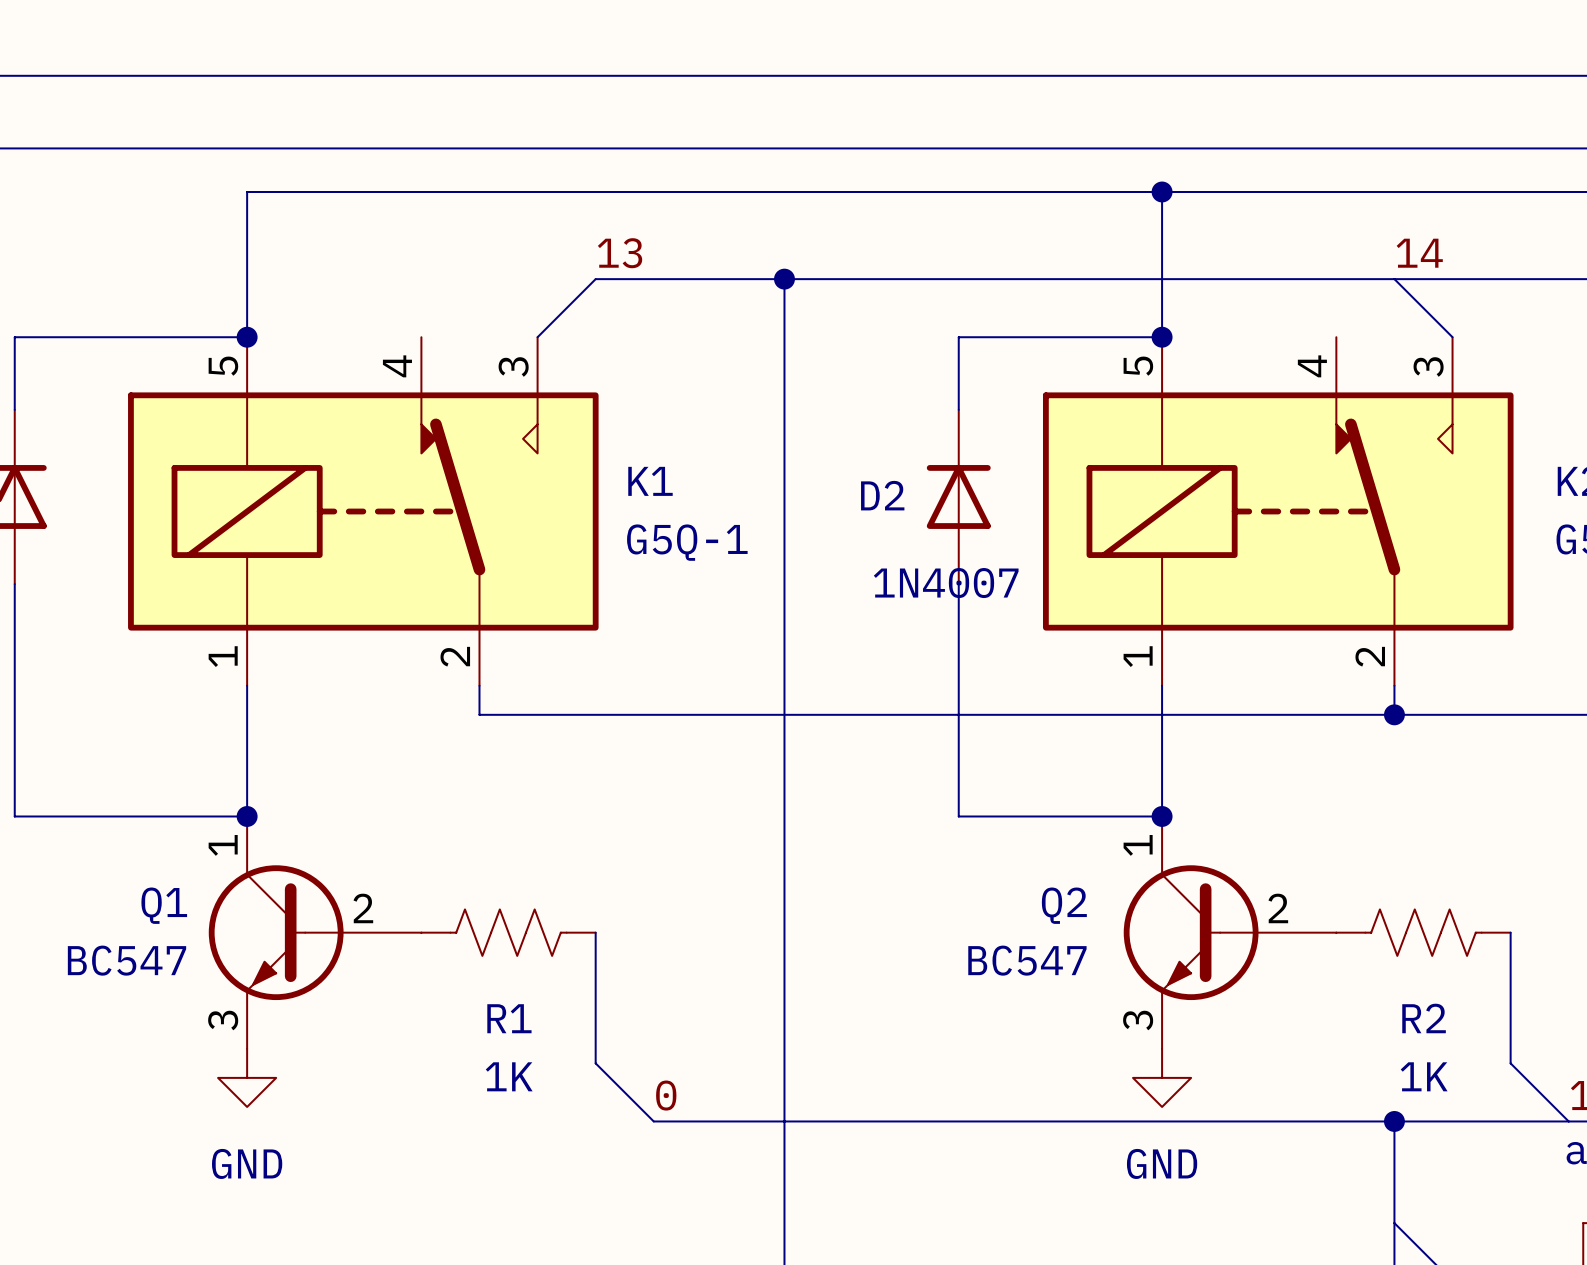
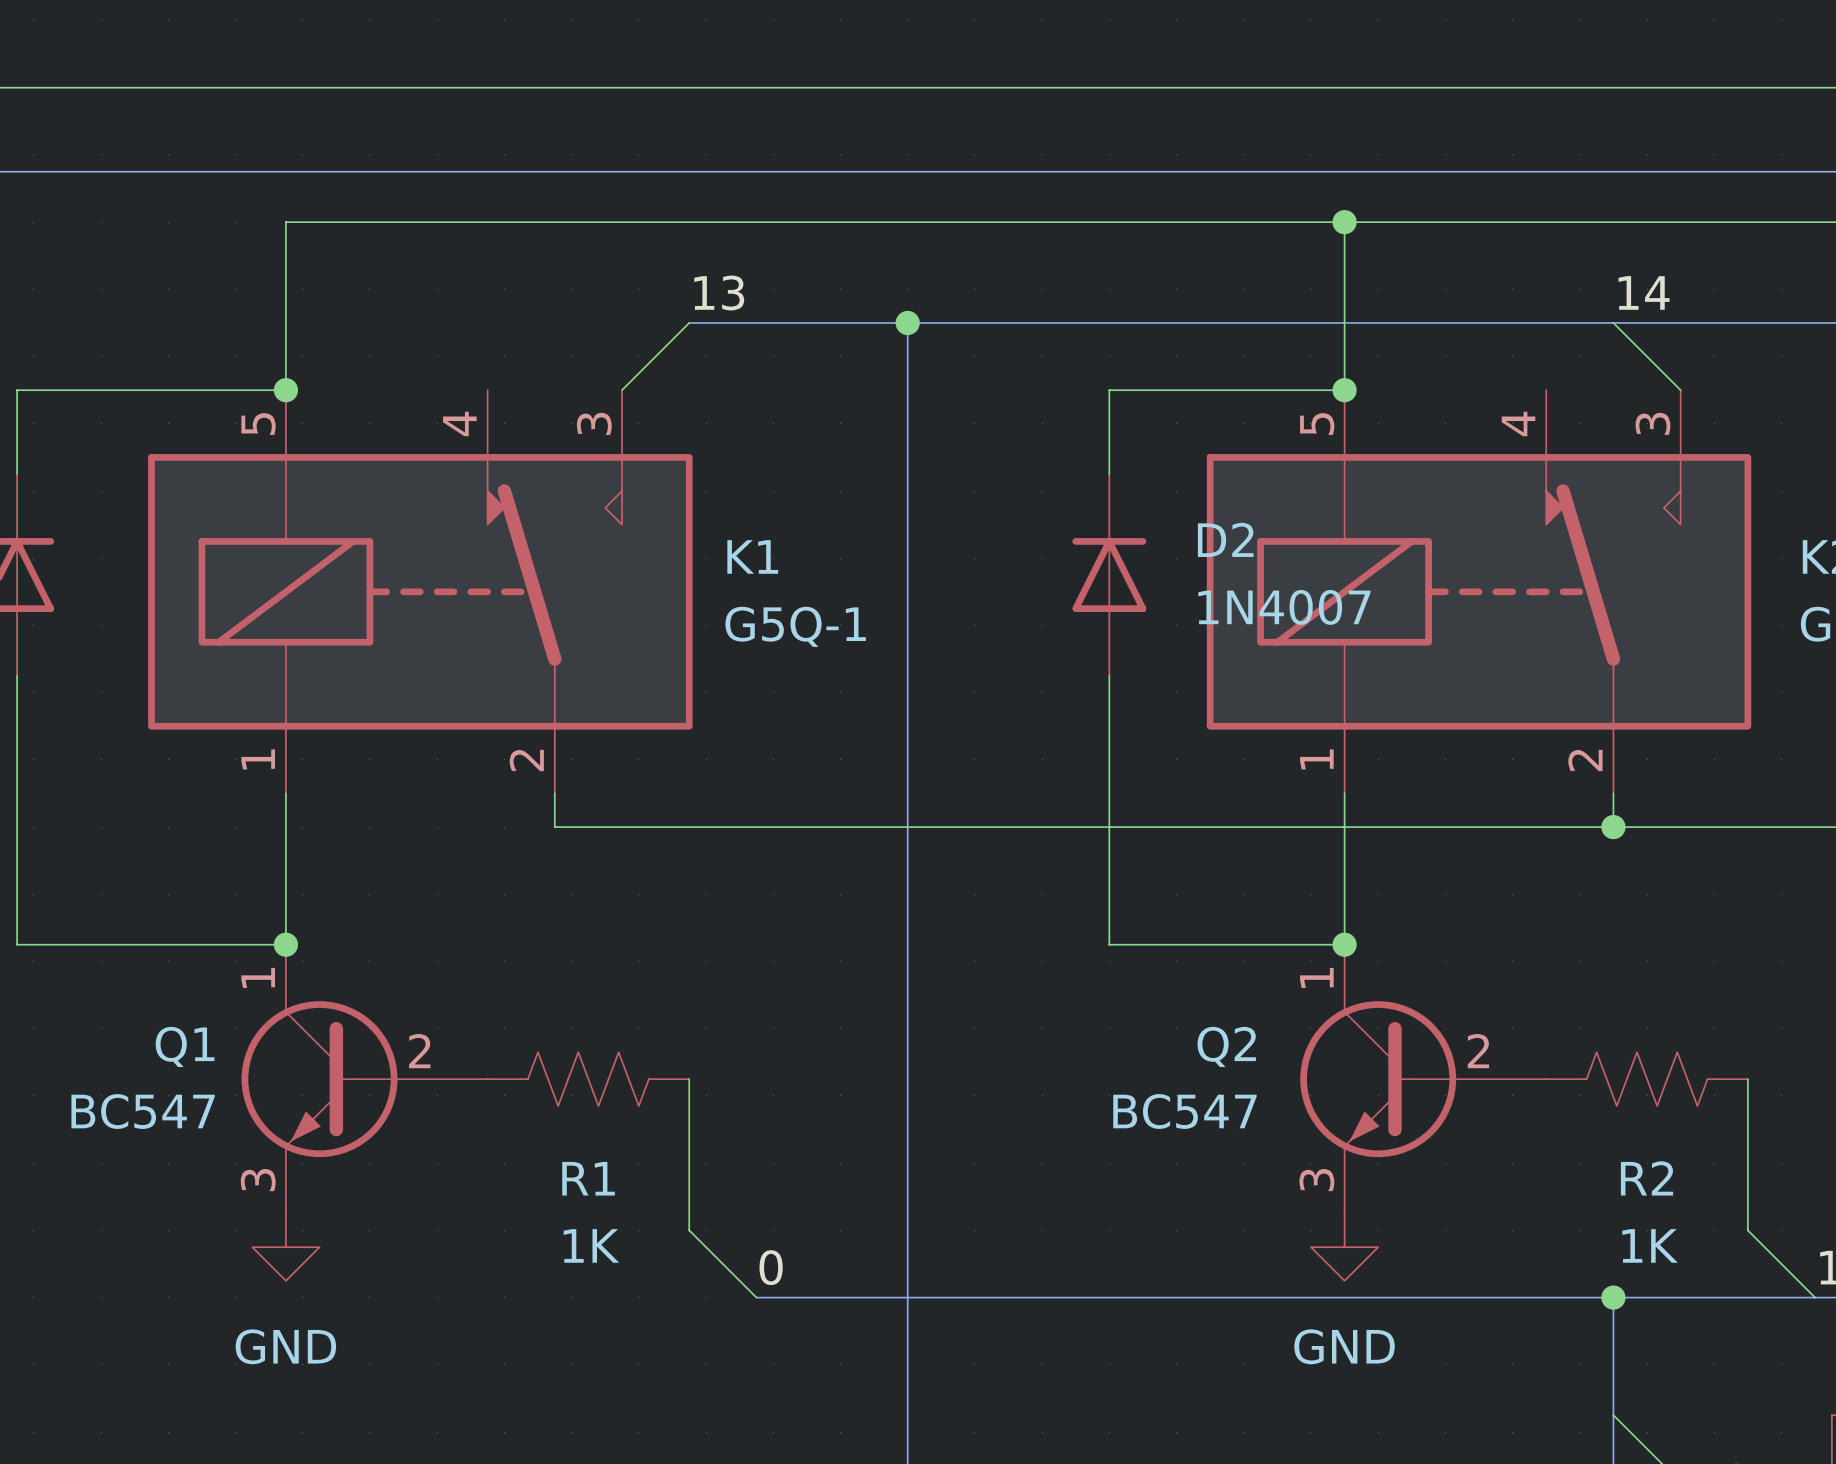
D2 name position: D2 (882, 495) -> D2 (1225, 539)
D2 value position: 1N4007 (946, 583) -> 1N4007 (1284, 607)

